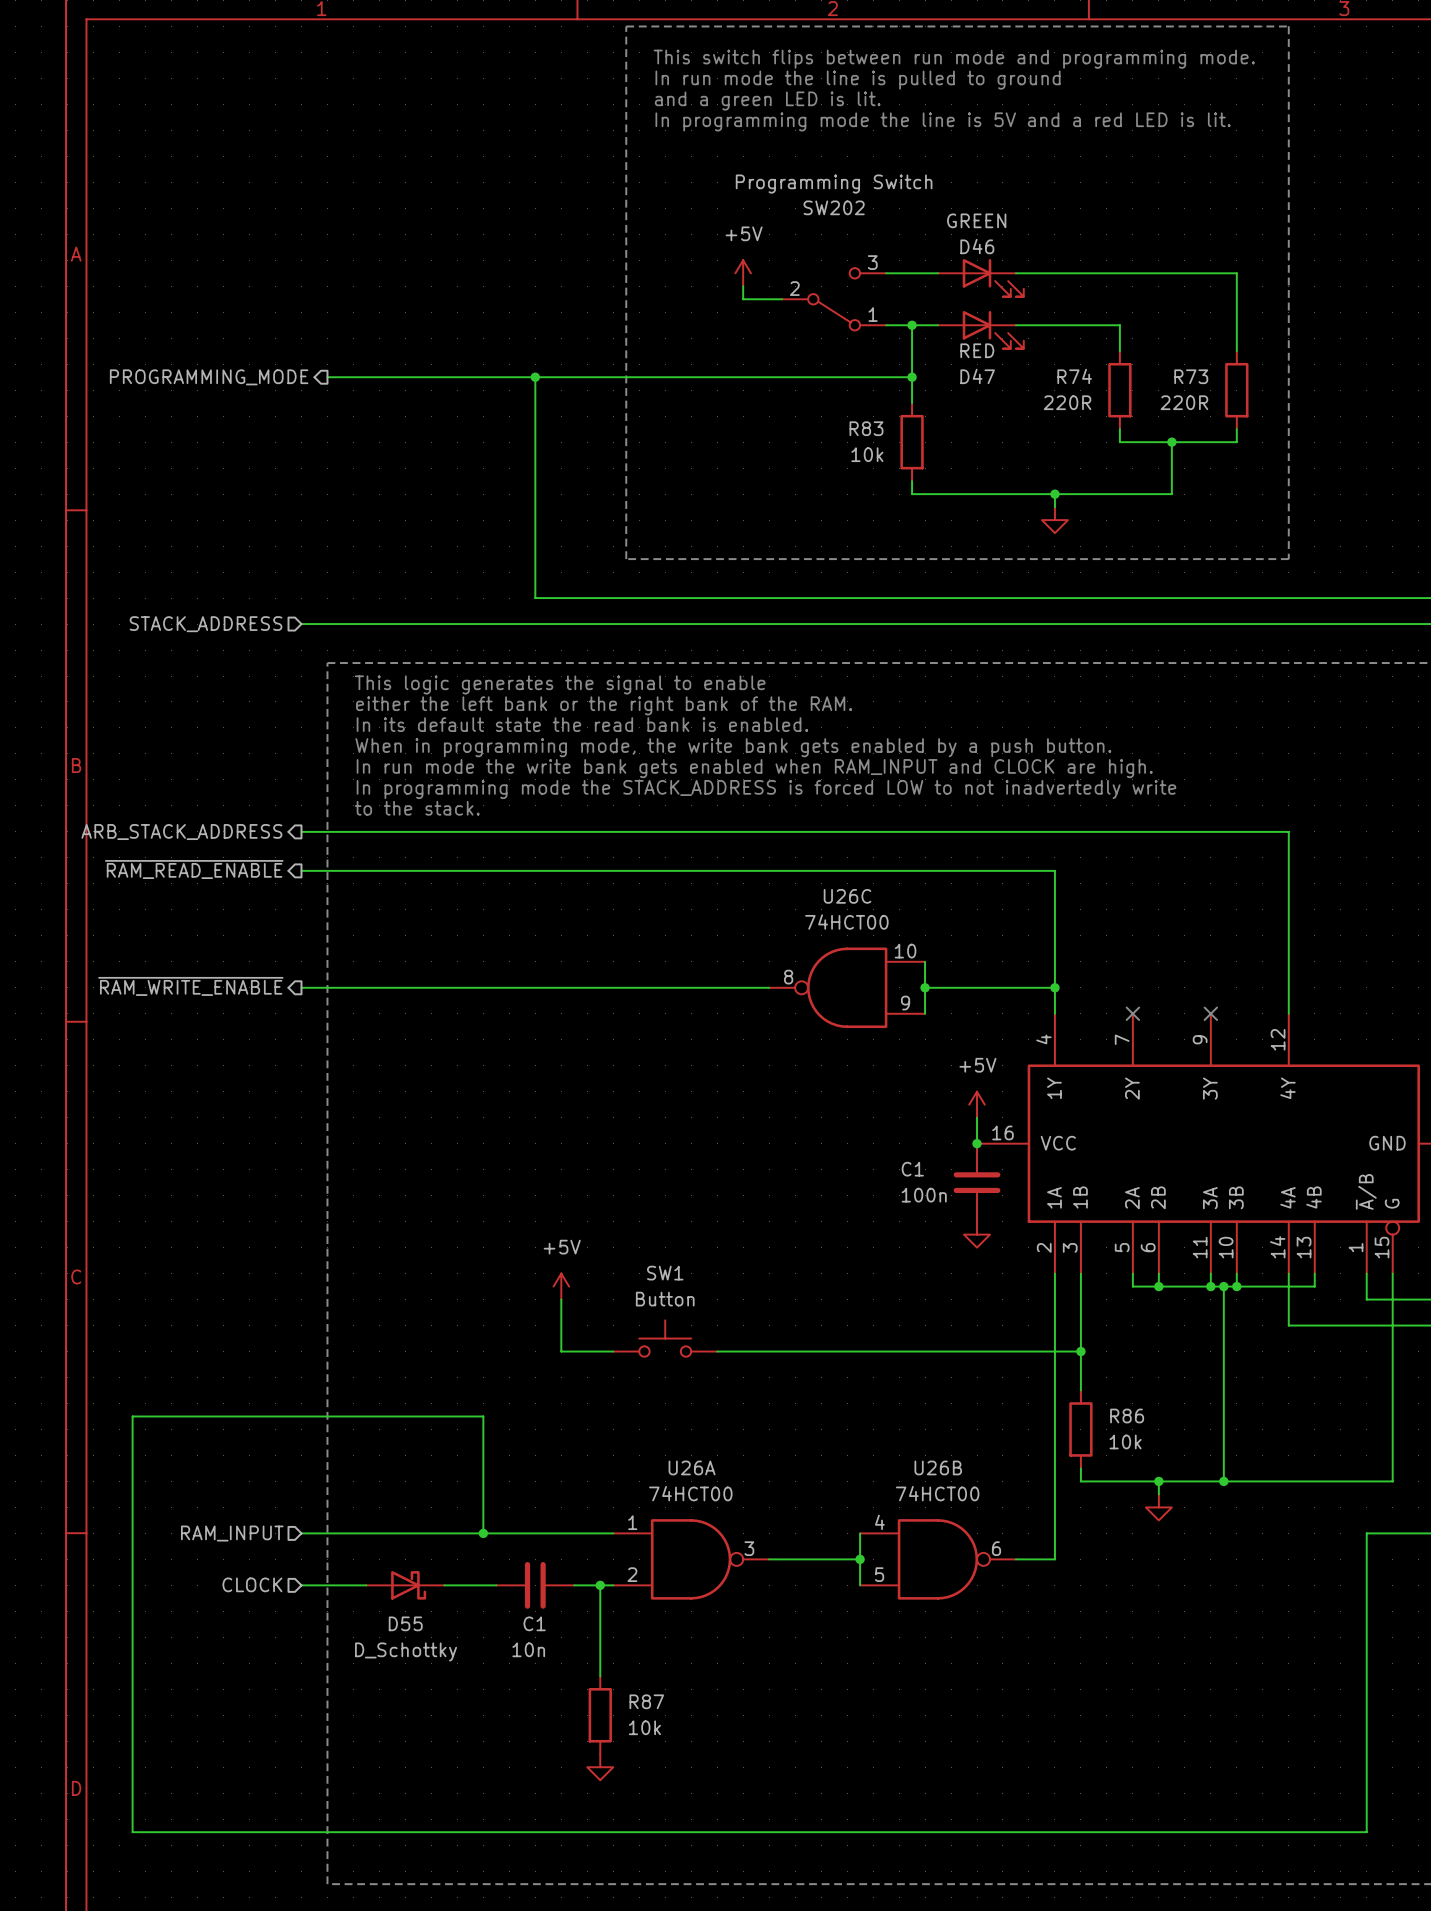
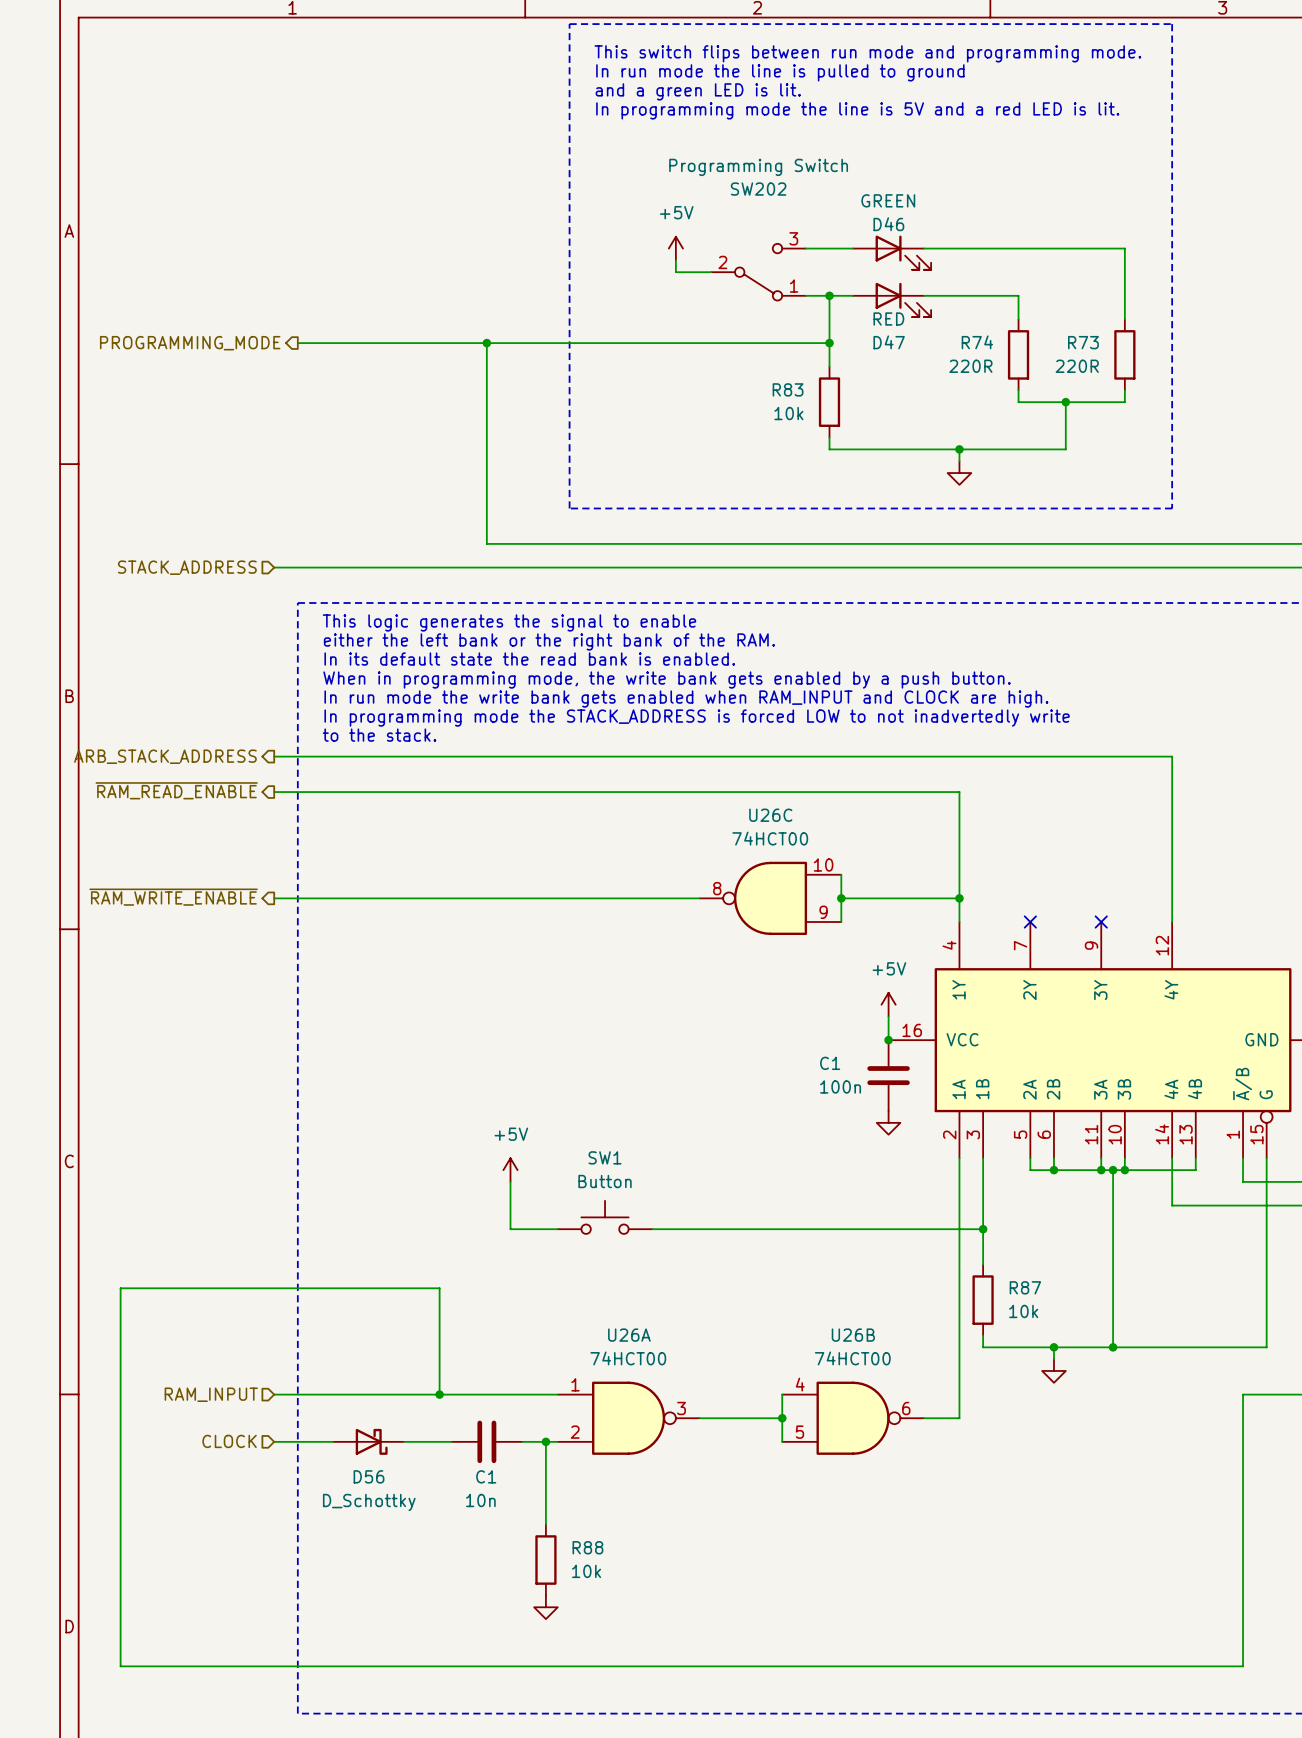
R86 name: R86 (1127, 1416) -> R87 (1025, 1287)
D55 name: D55 (405, 1623) -> D56 (369, 1476)
R87 name: R87 (646, 1701) -> R88 (587, 1547)

